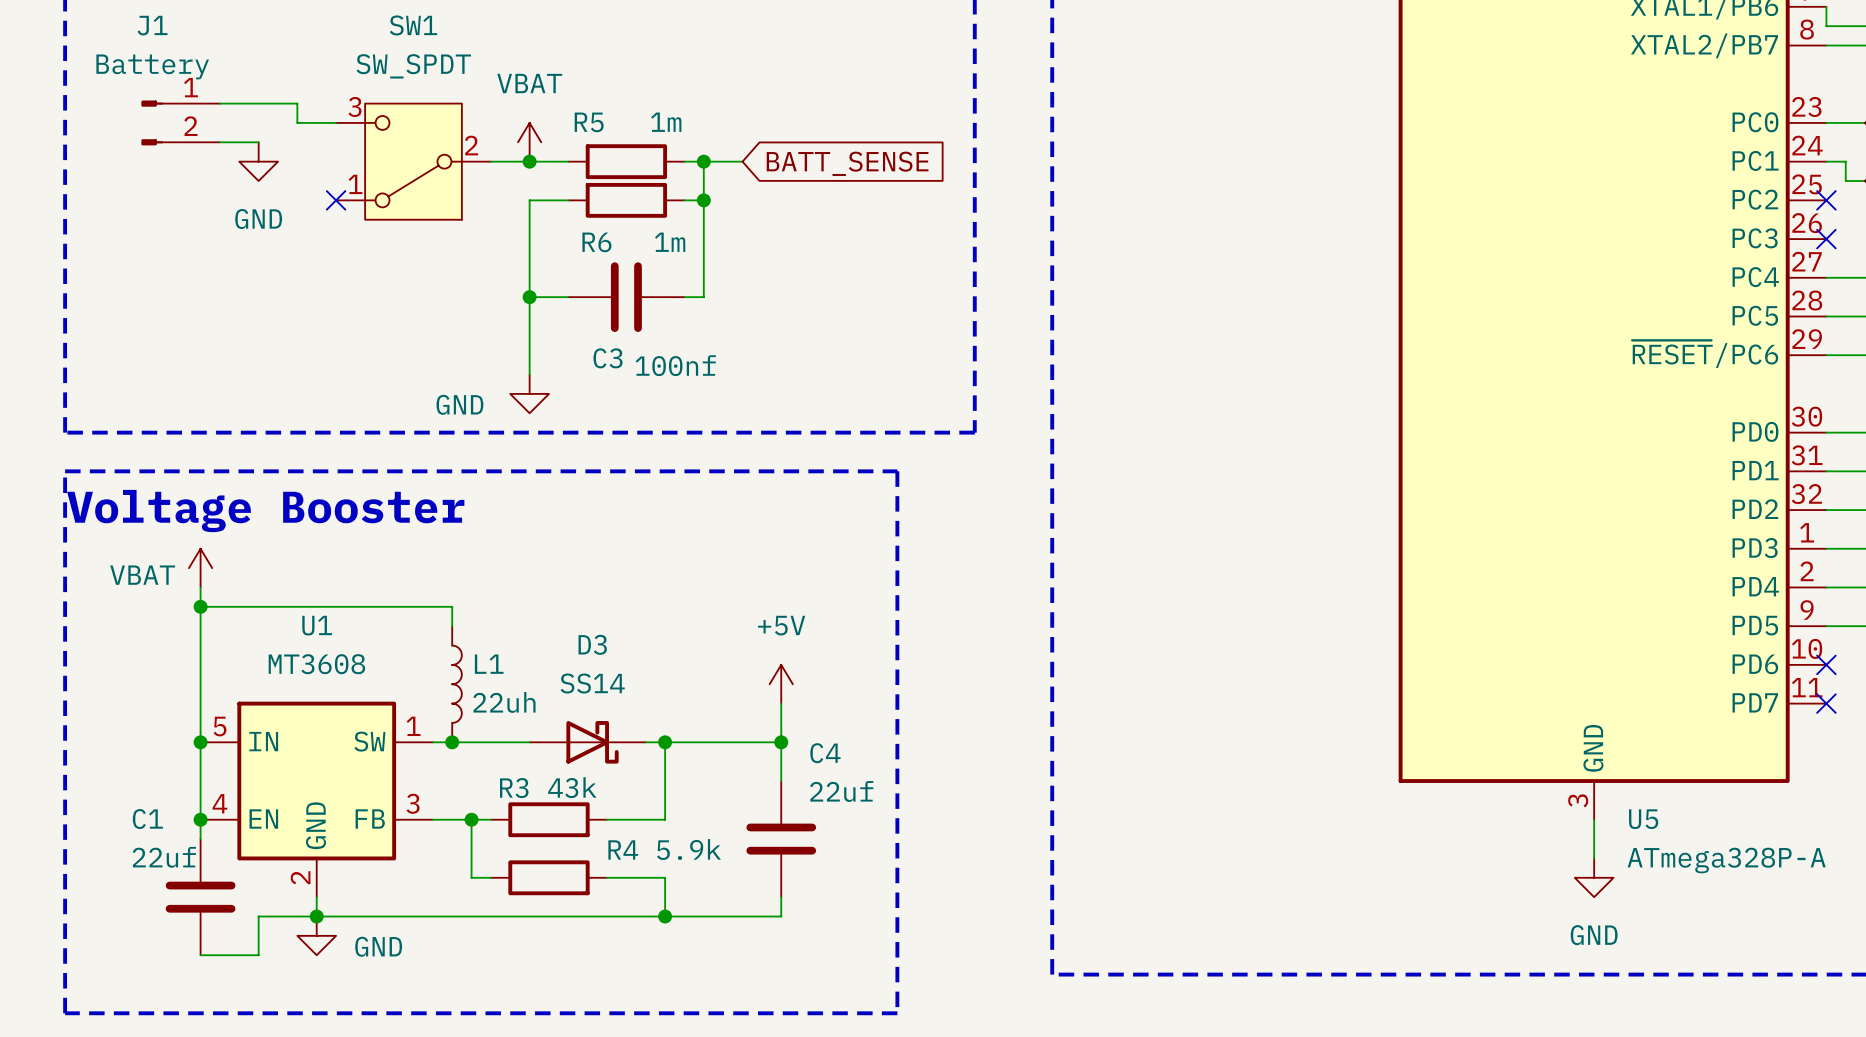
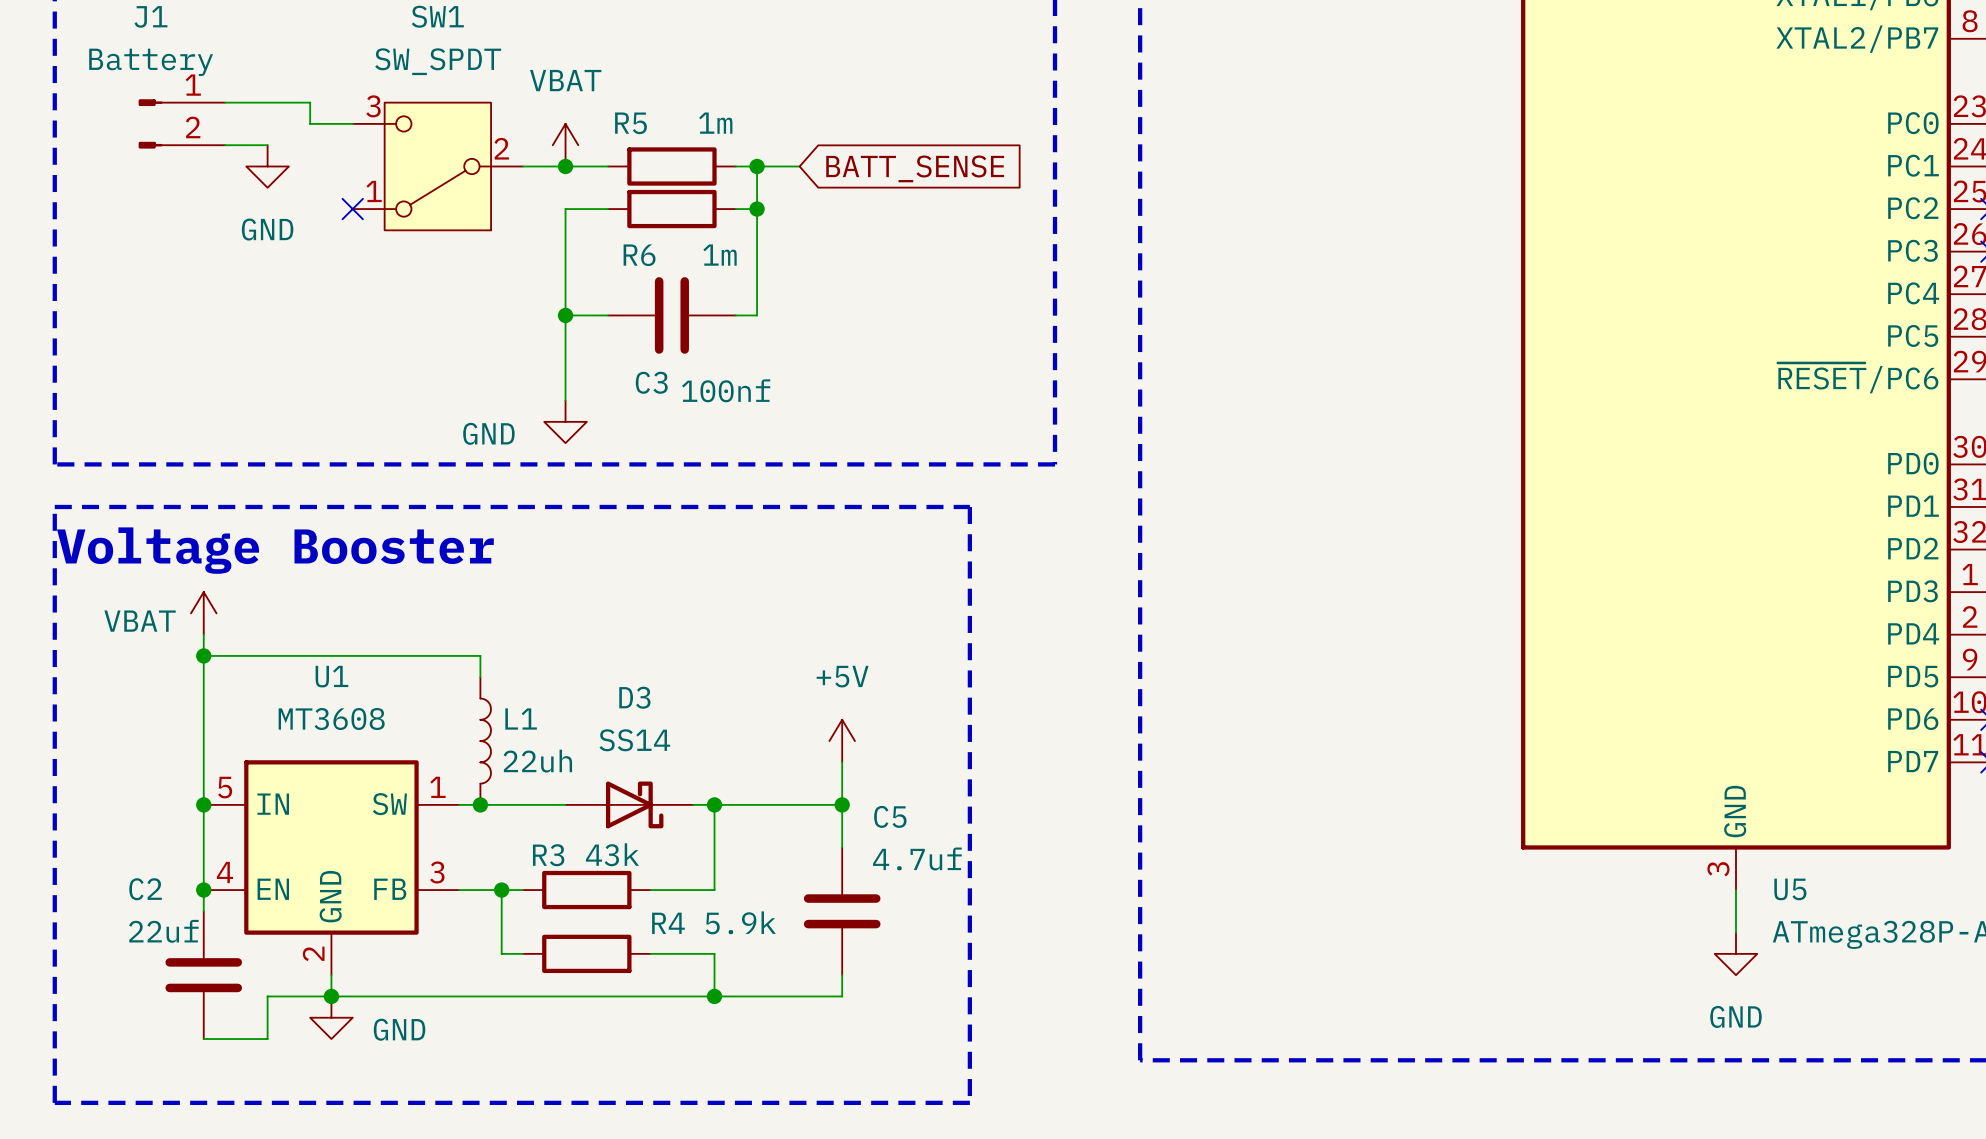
C4 name: C4 (825, 753) -> C5 (890, 816)
C4 value: 22uf (841, 791) -> 4.7uf (917, 859)
C1 name: C1 (147, 819) -> C2 (145, 889)

